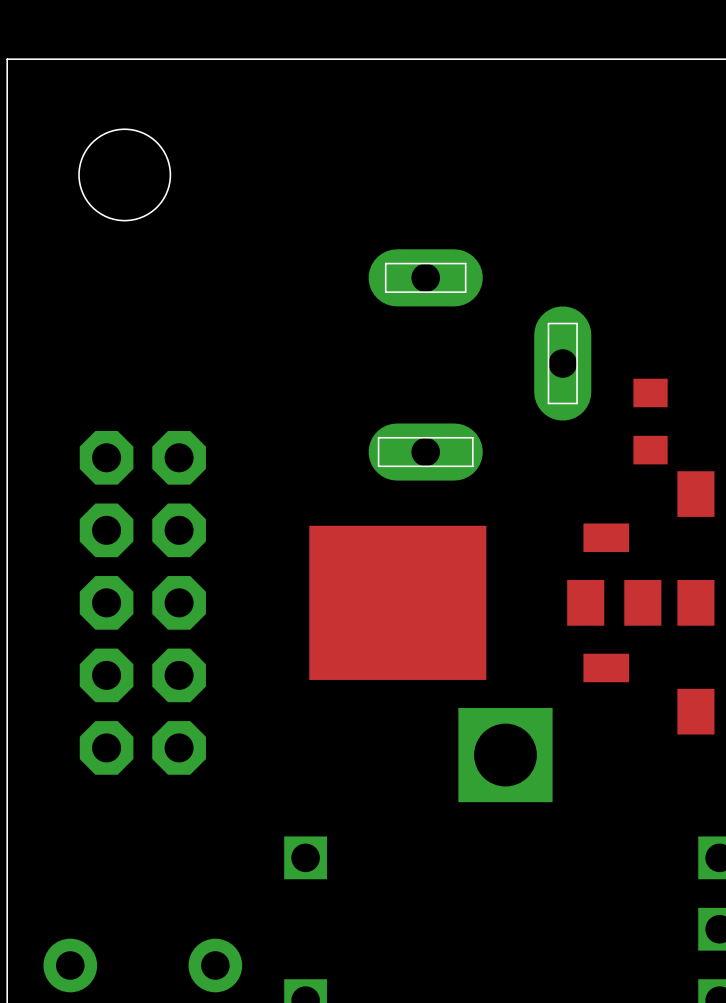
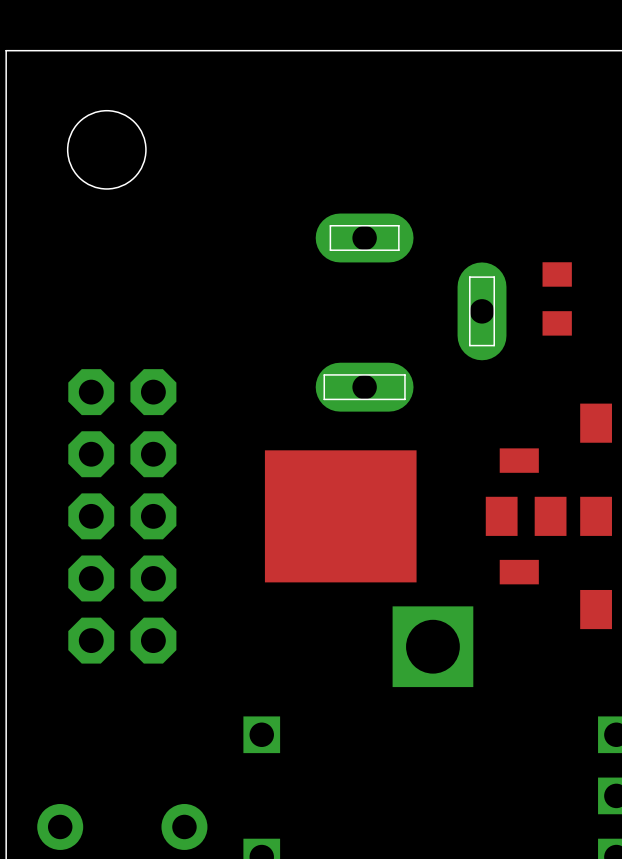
part position: (650, 421) -> (557, 298)

